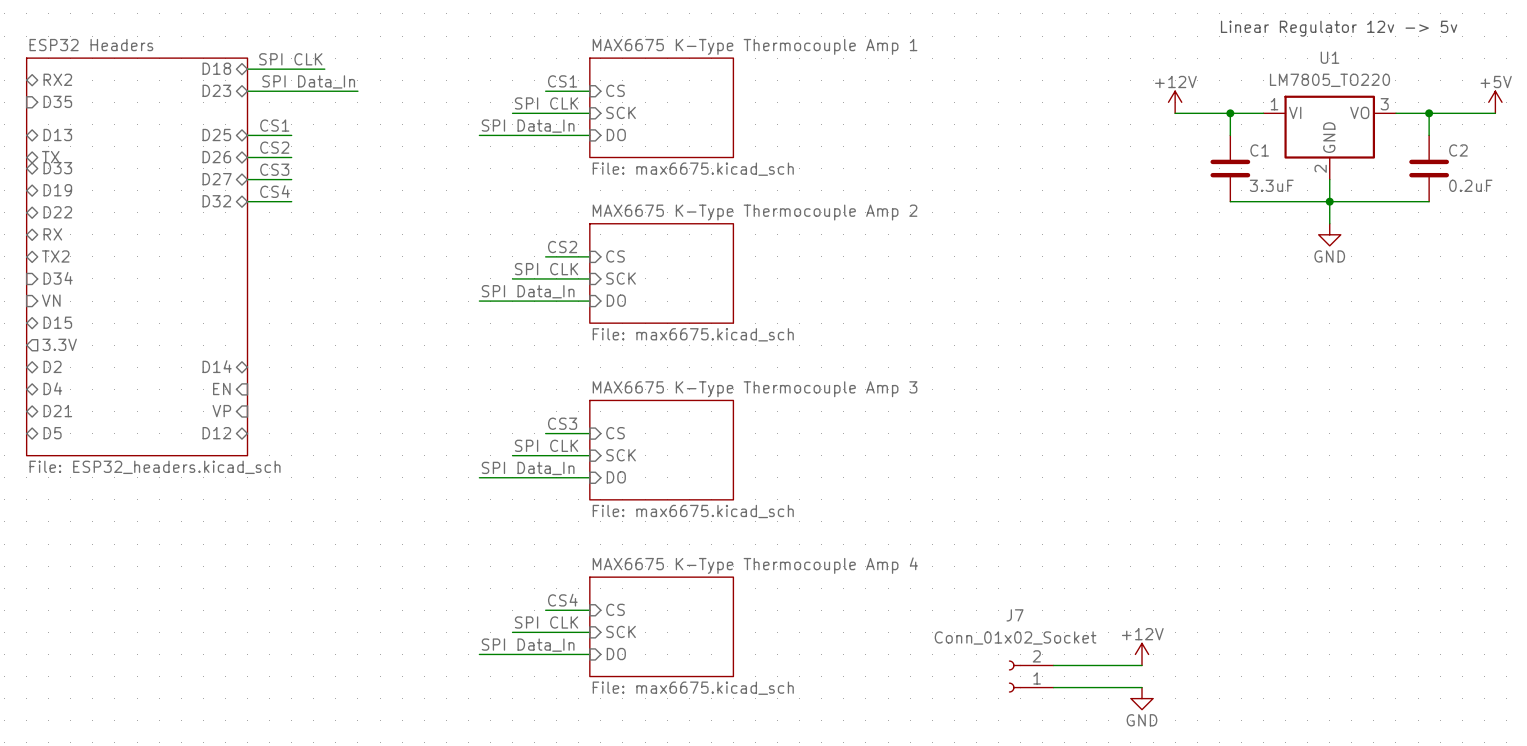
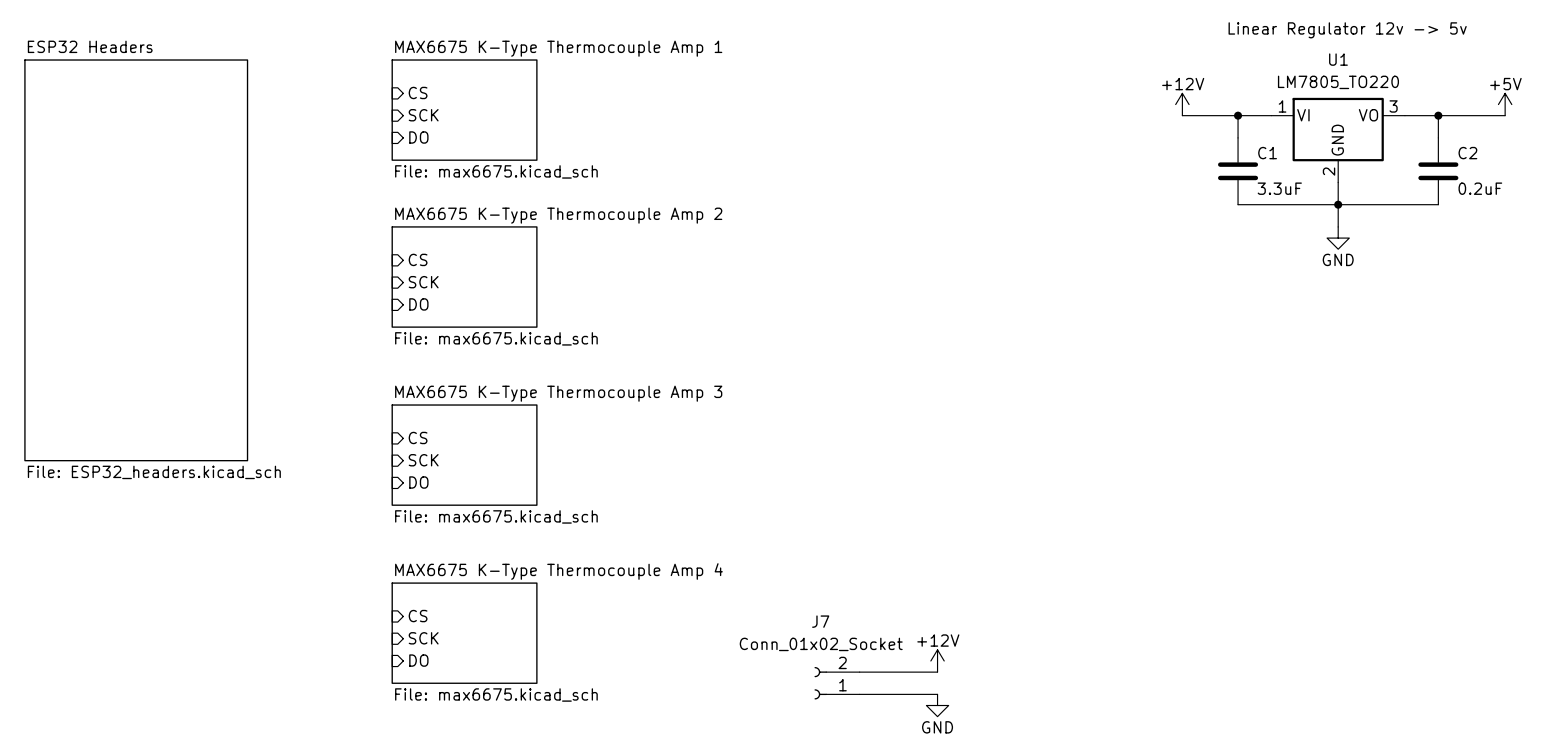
label: SPI CLK (290, 59) -> none
sheet pin: D18 (216, 68) -> none
wire: (247, 69) (324, 69) -> none
sheet pin: RX2 (57, 79) -> none
label: SPI Data_In (308, 81) -> none
label: CS1 (562, 81) -> none
sheet pin: D23 (216, 90) -> none
sheet pin: none -> CS (418, 92)
sheet pin: CS (615, 90) -> none
wire: (247, 91) (357, 91) -> none
wire: (545, 91) (589, 91) -> none
sheet pin: D35 (57, 101) -> none
label: SPI CLK (546, 103) -> none
sheet MAX6675 K-Type Thermocouple Amp 1 position: (661, 107) -> (464, 110)
sheet pin: none -> SCK (423, 115)
sheet pin: SCK (621, 112) -> none
wire: (512, 113) (589, 113) -> none
label: CS1 (274, 125) -> none
label: SPI Data_In (528, 126) -> none
sheet pin: D13 (57, 135) -> none
sheet pin: D25 (216, 135) -> none
wire: (247, 135) (291, 135) -> none
sheet pin: none -> DO (418, 137)
wire: (479, 135) (589, 135) -> none
sheet pin: DO (616, 135) -> none
label: CS2 (274, 147) -> none
sheet pin: TX (50, 157) -> none
sheet pin: D26 (216, 157) -> none
wire: (247, 157) (291, 157) -> none
sheet pin: D33 (57, 168) -> none
label: CS3 (274, 169) -> none
sheet pin: D27 (217, 179) -> none
wire: (247, 179) (291, 179) -> none
sheet pin: D19 (57, 190) -> none
label: CS4 (275, 191) -> none
sheet pin: D32 (216, 201) -> none
wire: (247, 201) (291, 201) -> none
sheet pin: D22 (57, 212) -> none
sheet pin: RX (52, 234) -> none
label: CS2 (562, 247) -> none
sheet pin: TX2 (55, 256) -> none
sheet pin: none -> CS (418, 259)
wire: (545, 256) (589, 256) -> none
sheet pin: CS (615, 256) -> none
label: SPI CLK (546, 269) -> none
sheet MAX6675 K-Type Thermocouple Amp 2 position: (661, 273) -> (464, 277)
sheet pin: D34 (58, 278) -> none
sheet pin: none -> SCK (423, 282)
wire: (512, 278) (589, 278) -> none
sheet pin: SCK (621, 278) -> none
label: SPI Data_In (528, 291) -> none
sheet pin: VN (51, 300) -> none
sheet pin: none -> DO (418, 304)
sheet pin: DO (616, 300) -> none
wire: (479, 301) (589, 301) -> none
sheet pin: D15 (57, 322) -> none
sheet pin: 3.3V (59, 344) -> none
sheet pin: D2 (52, 366) -> none
sheet pin: D14 (217, 366) -> none
sheet pin: D4 (52, 388) -> none
sheet pin: EN (221, 388) -> none
sheet pin: D21 (57, 411) -> none
sheet pin: VP (221, 411) -> none
label: CS3 (562, 423) -> none
sheet pin: D5 (52, 433) -> none
sheet pin: D12 (216, 433) -> none
sheet pin: none -> CS (418, 437)
wire: (545, 433) (589, 433) -> none
sheet pin: CS (615, 433) -> none
label: SPI CLK (546, 445) -> none
sheet MAX6675 K-Type Thermocouple Amp 3 position: (661, 450) -> (464, 455)
sheet pin: none -> SCK (423, 460)
wire: (512, 455) (589, 455) -> none
sheet pin: SCK (621, 455) -> none
label: SPI Data_In (528, 468) -> none
sheet pin: none -> DO (418, 482)
wire: (479, 477) (589, 477) -> none
sheet pin: DO (616, 477) -> none
label: CS4 (562, 600) -> none
sheet pin: none -> CS (418, 616)
sheet pin: CS (615, 609) -> none
wire: (545, 610) (589, 610) -> none
label: SPI CLK (546, 622) -> none
sheet MAX6675 K-Type Thermocouple Amp 4 position: (661, 626) -> (464, 633)
sheet pin: none -> SCK (423, 638)
sheet pin: SCK (621, 631) -> none
wire: (512, 632) (589, 632) -> none
label: SPI Data_In (528, 645) -> none
sheet pin: none -> DO (418, 660)
wire: (479, 654) (589, 654) -> none
sheet pin: DO (616, 654) -> none
power symbol position: +12V (1142, 654) -> +12V (937, 660)
wire: none -> (859, 672) (937, 672)
wire: (1053, 665) (1142, 665) -> none
J7 position: (1031, 676) -> (837, 683)
wire: none -> (859, 694) (937, 694)
wire: (1053, 687) (1142, 687) -> none
power symbol position: GND (1142, 698) -> GND (937, 705)

